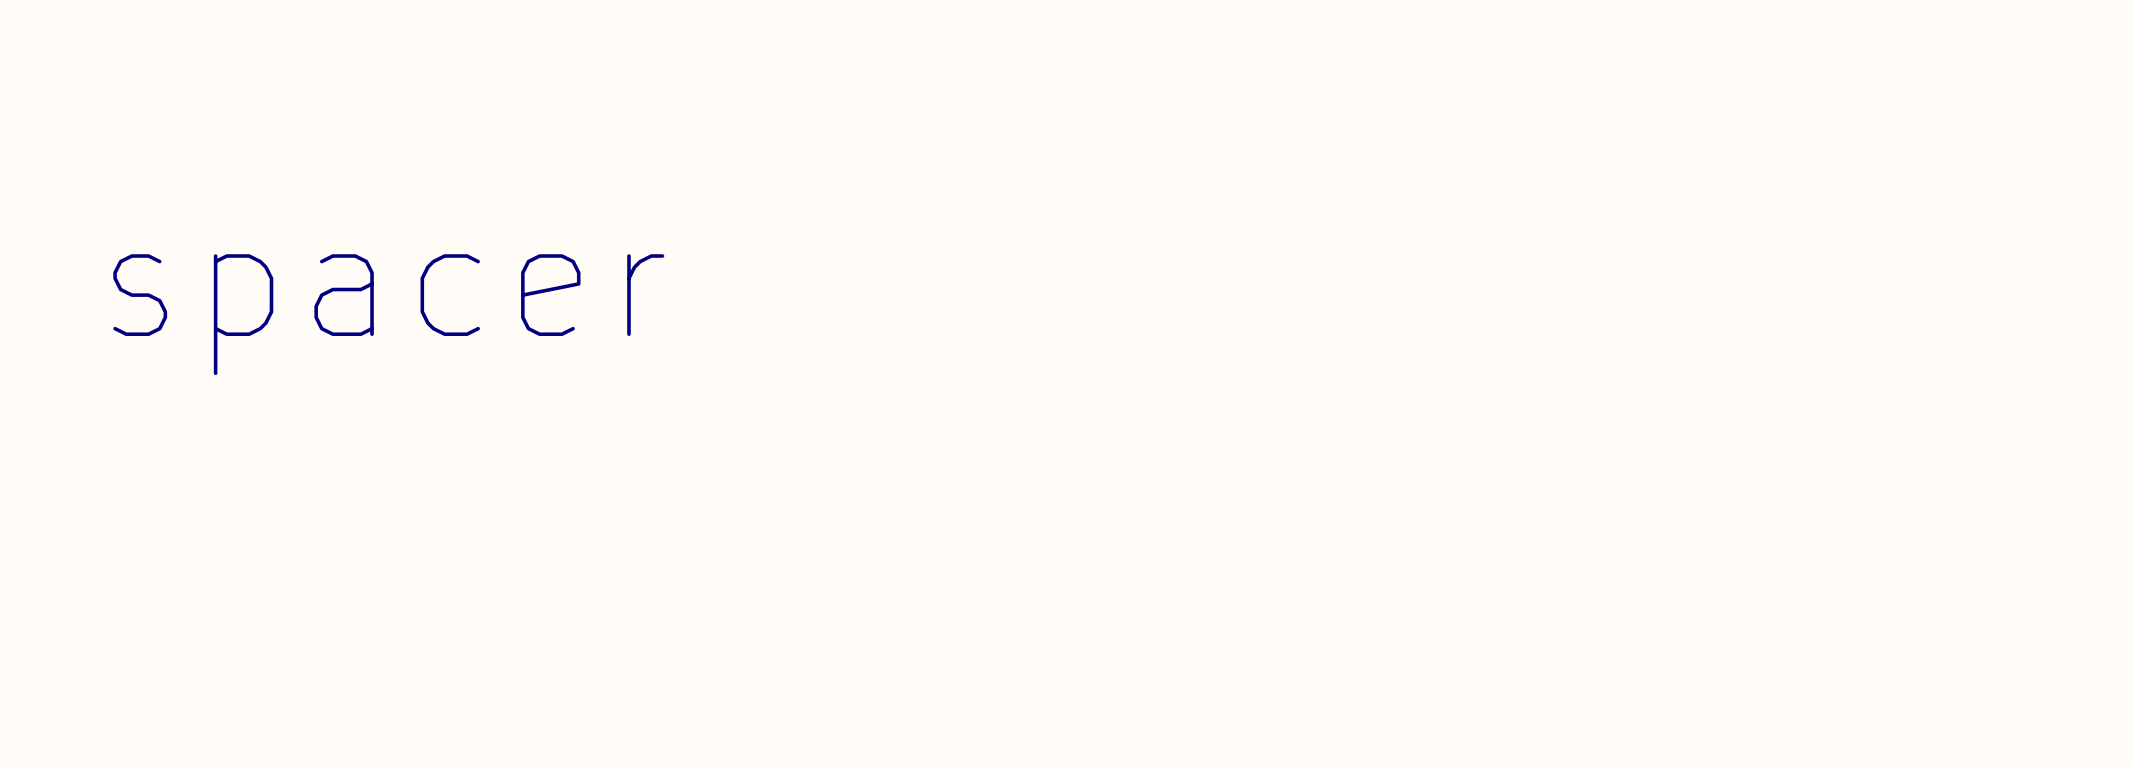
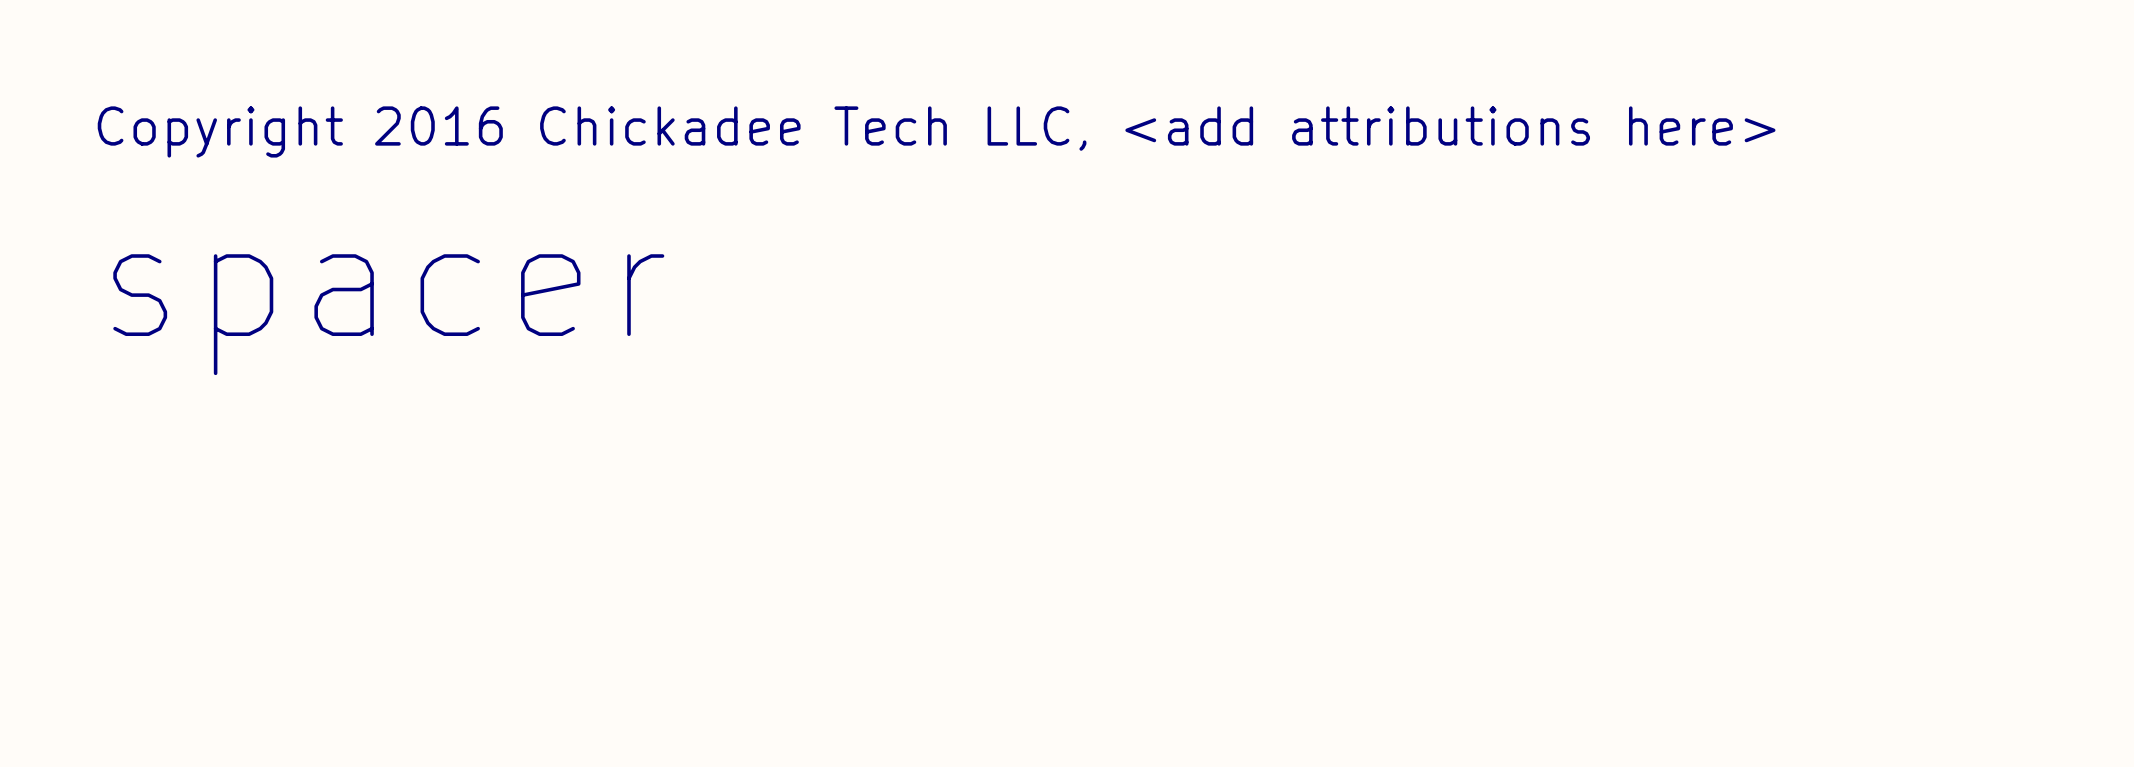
text: none -> Copyright 2016 Chickadee Tech LLC, <add attributions here> (936, 131)

